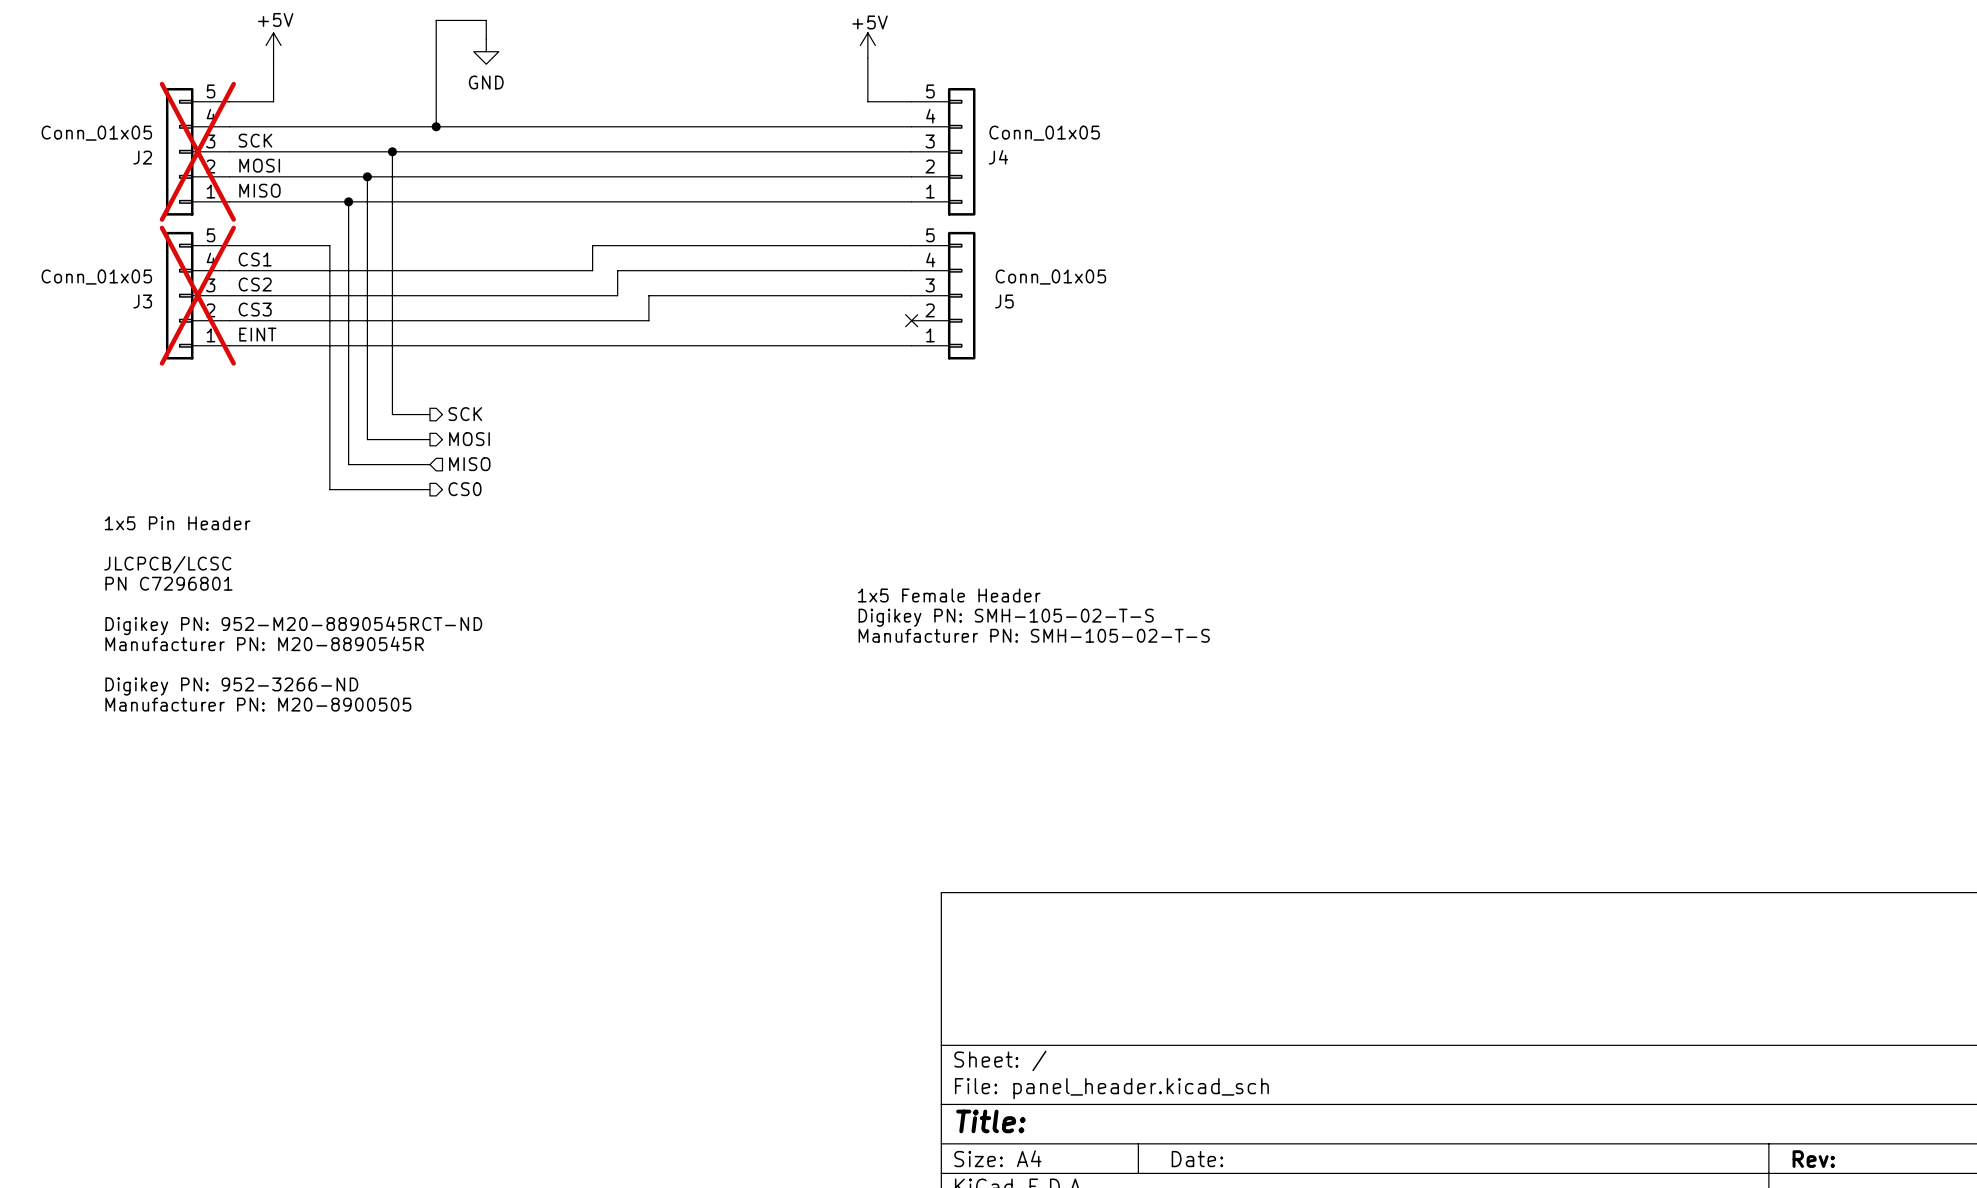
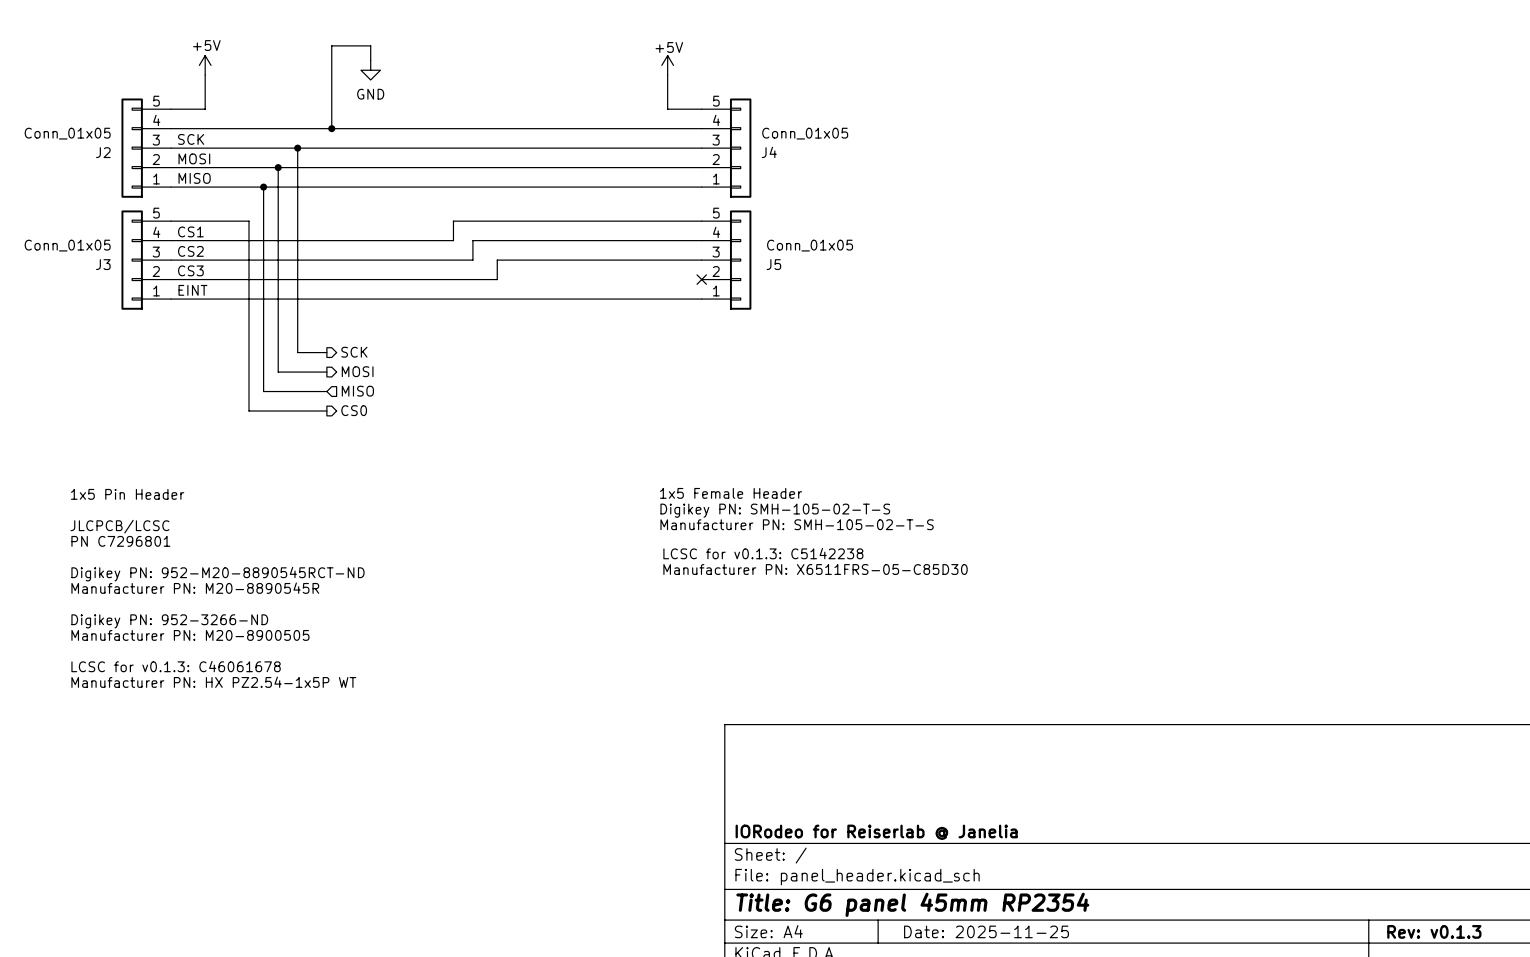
J2 do-not-place cross: (197, 151) -> none
J3 do-not-place cross: (197, 295) -> none
text position: 1x5 Pin Header (177, 523) -> 1x5 Pin Header (127, 494)
text position: JLCPCB/LCSC (167, 564) -> JLCPCB/LCSC (119, 526)
text position: PN C7296801 (168, 583) -> PN C7296801 (120, 541)
text position: Digikey PN: 952-M20-8890545RCT-ND (293, 625) -> Digikey PN: 952-M20-8890545RCT-ND (218, 574)
text position: Manufacturer PN: M20-8890545R (264, 643) -> Manufacturer PN: M20-8890545R (195, 588)
text: none -> LCSC for v0.1.3: C5142238 (763, 553)
text position: Digikey PN: 952-3266-ND (231, 686) -> Digikey PN: 952-3266-ND (169, 621)
text: none -> Manufacturer PN: X6511FRS-05-C85D30 (815, 569)
text position: Manufacturer PN: M20-8900505 (258, 704) -> Manufacturer PN: M20-8900505 (190, 635)
text: none -> LCSC for v0.1.3: C46061678 (176, 666)
text: none -> Manufacturer PN: HX PZ2.54-1x5P WT (213, 682)
title block: none -> IORodeo for Reiserlab @ Janelia (876, 832)
title block: Title: (990, 1121) -> Title: G6 panel 45mm RP2354 (912, 904)
title block: Date: (1197, 1159) -> Date: 2025-11-25 (986, 931)
title block: Rev: (1813, 1159) -> Rev: v0.1.3 (1434, 931)

